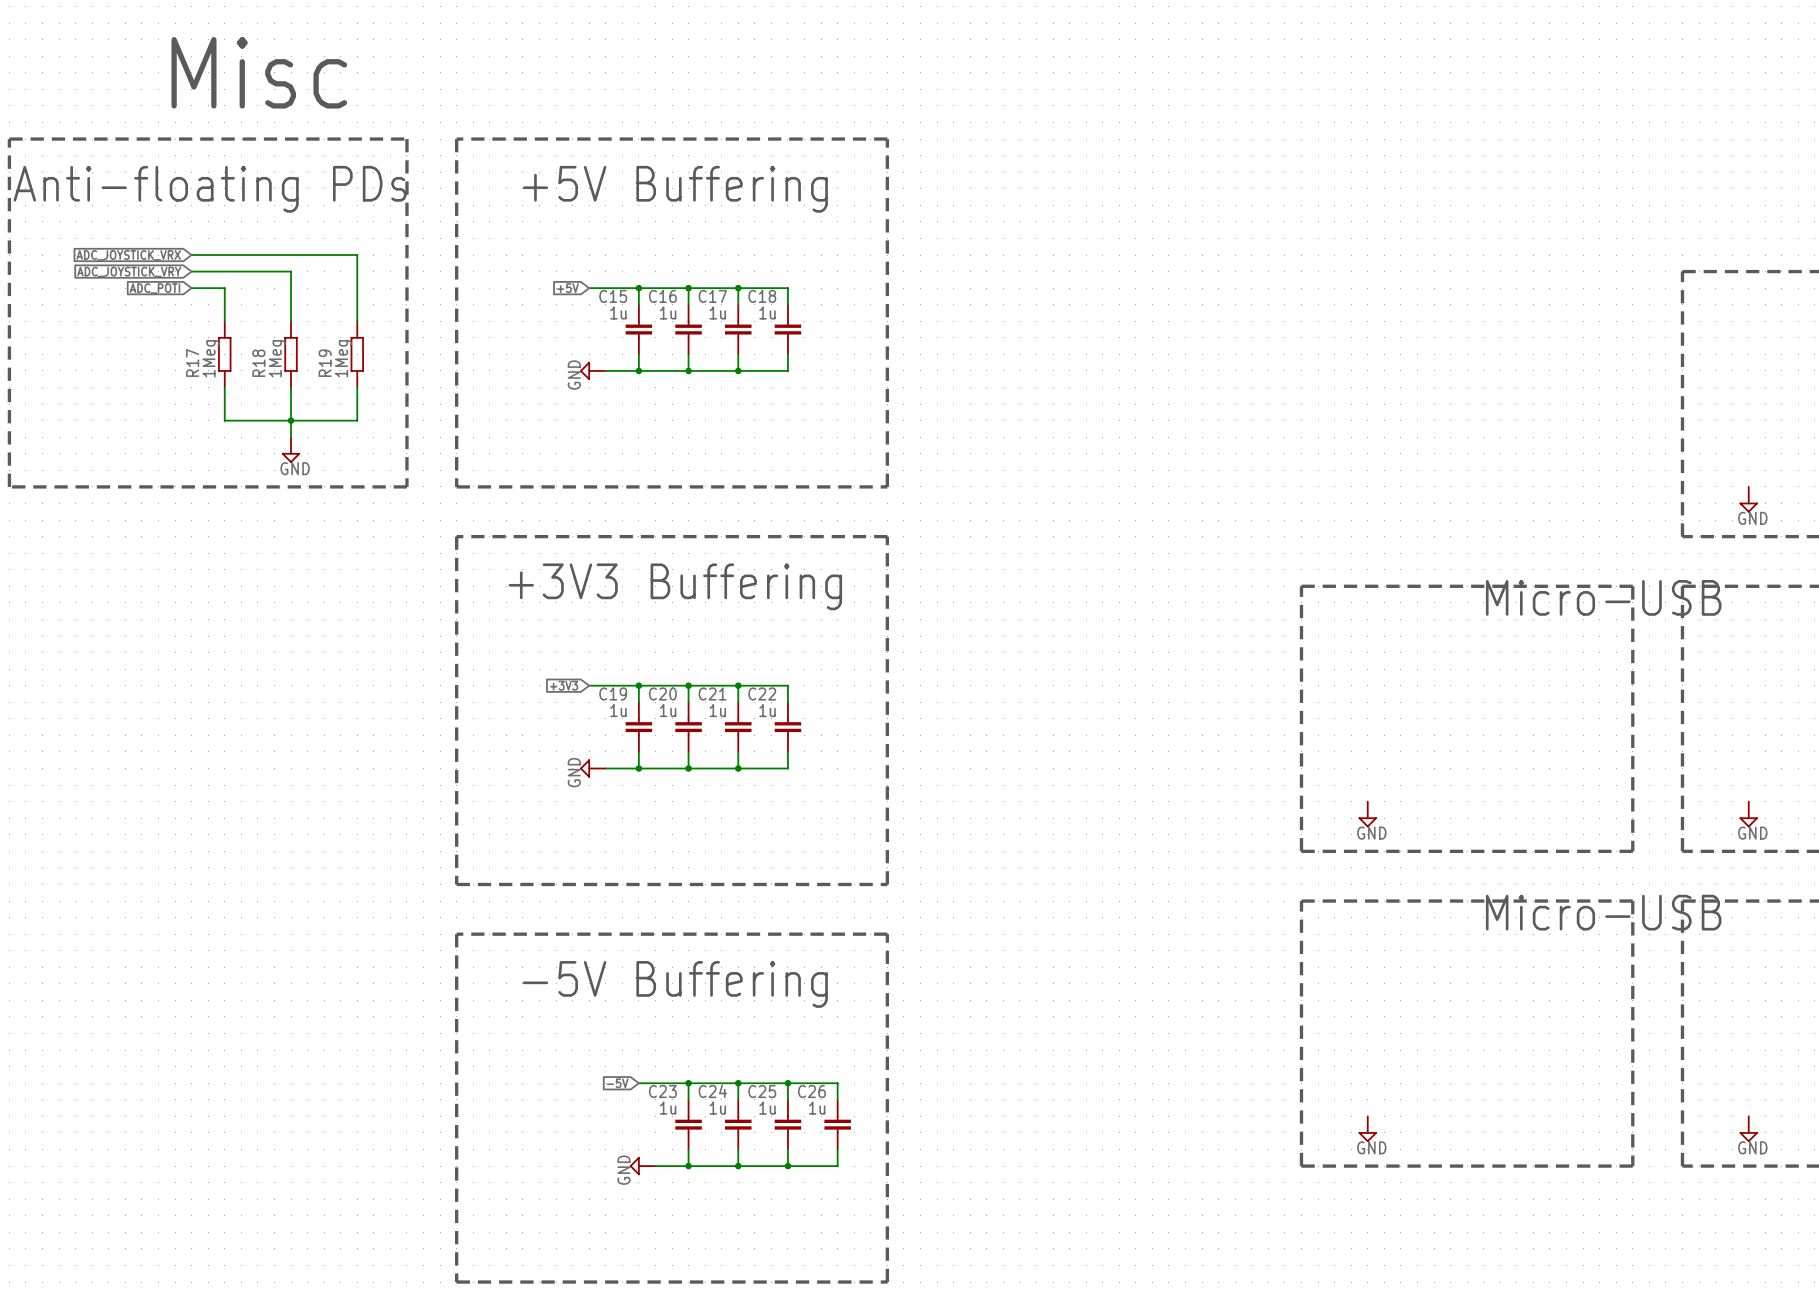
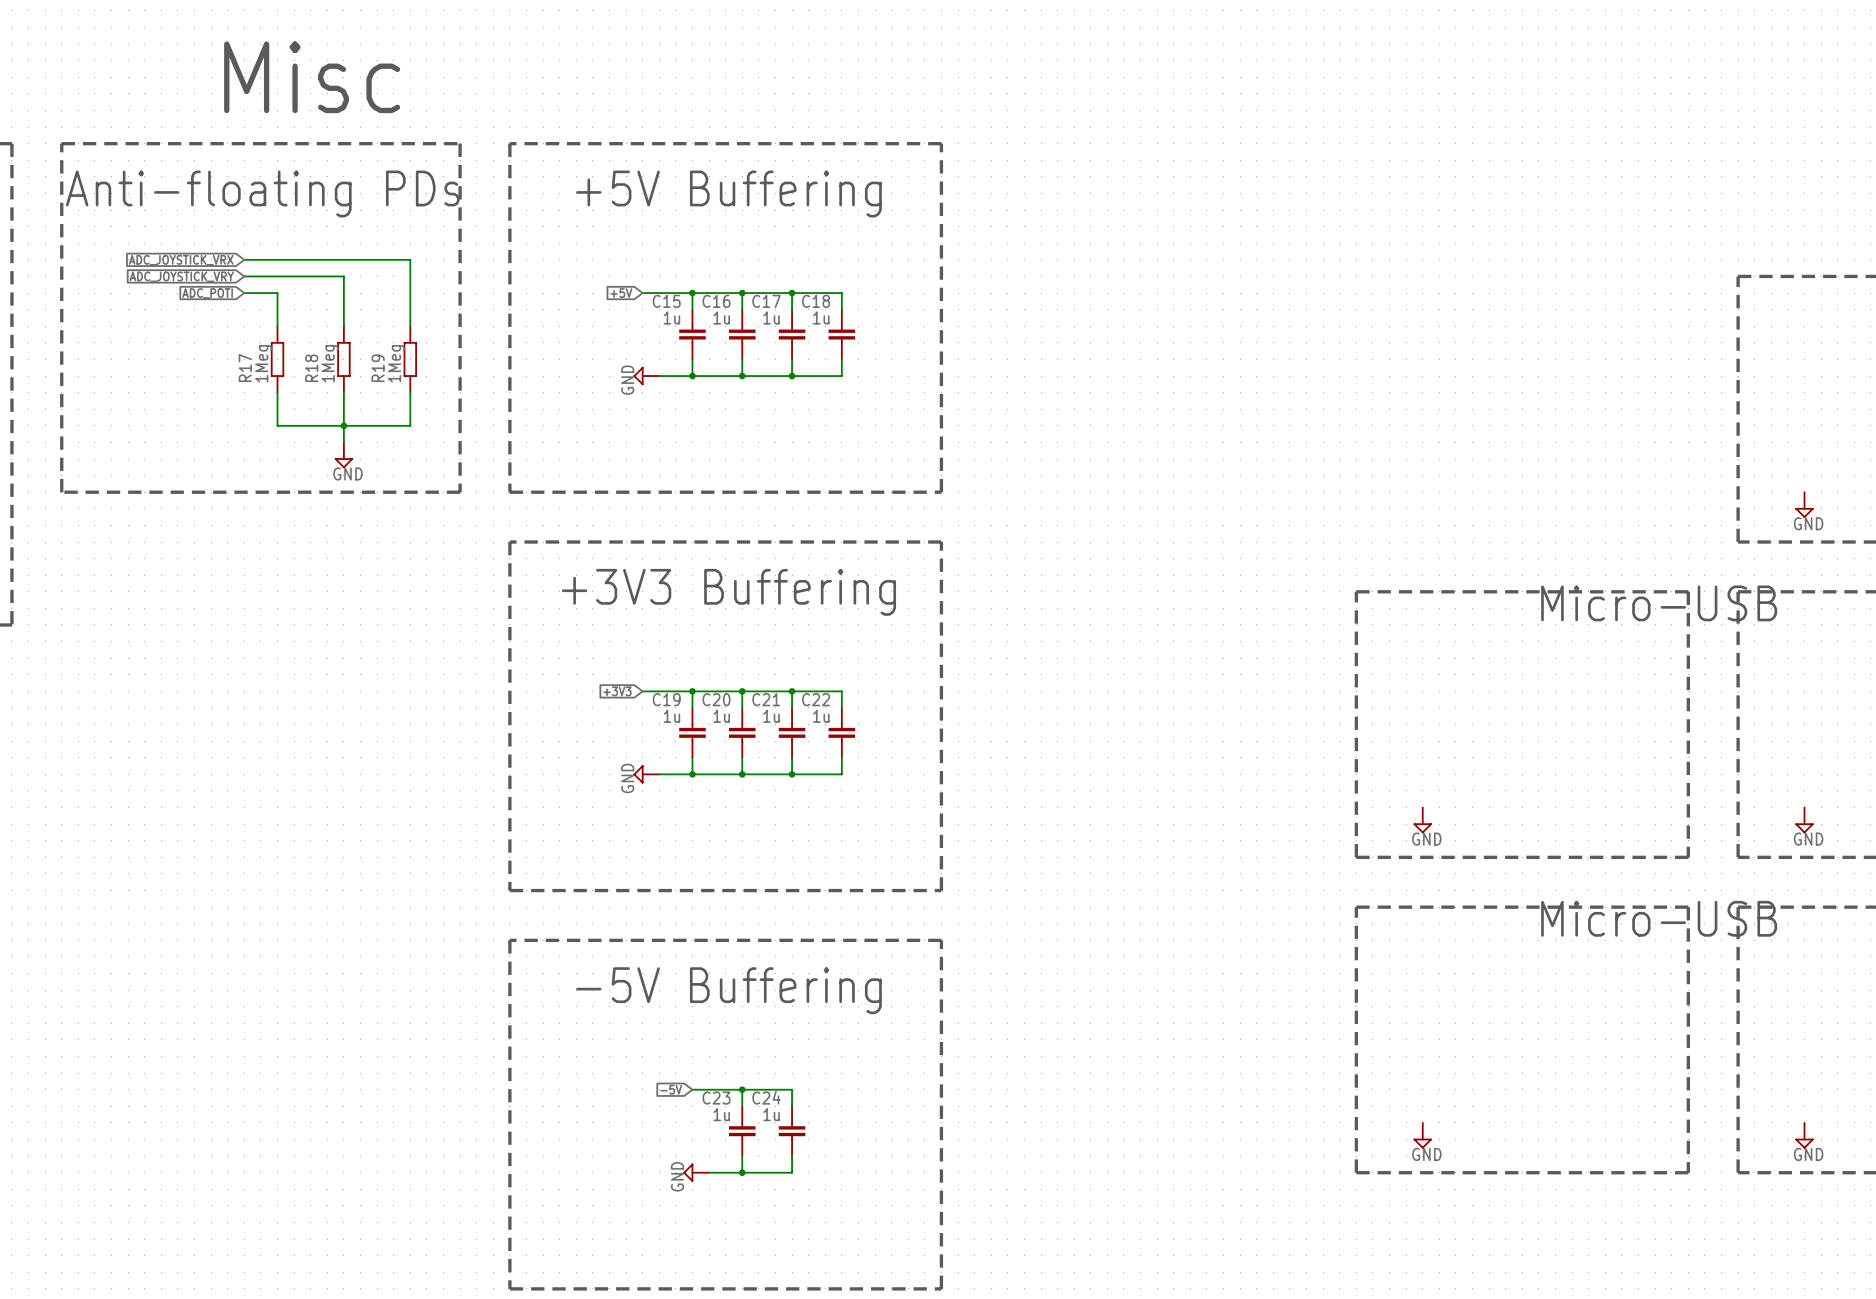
wire: (738, 1083) (837, 1083) (837, 1099) -> none
junction: (738, 1083) -> none
wire: (787, 1083) (787, 1099) -> none
junction: (787, 1083) -> none
C25: 1u (787, 1124) -> none
C26: 1u (837, 1124) -> none
wire: (787, 1149) (787, 1166) -> none
wire: (837, 1149) (837, 1166) (738, 1166) -> none
junction: (738, 1166) -> none
junction: (787, 1166) -> none

